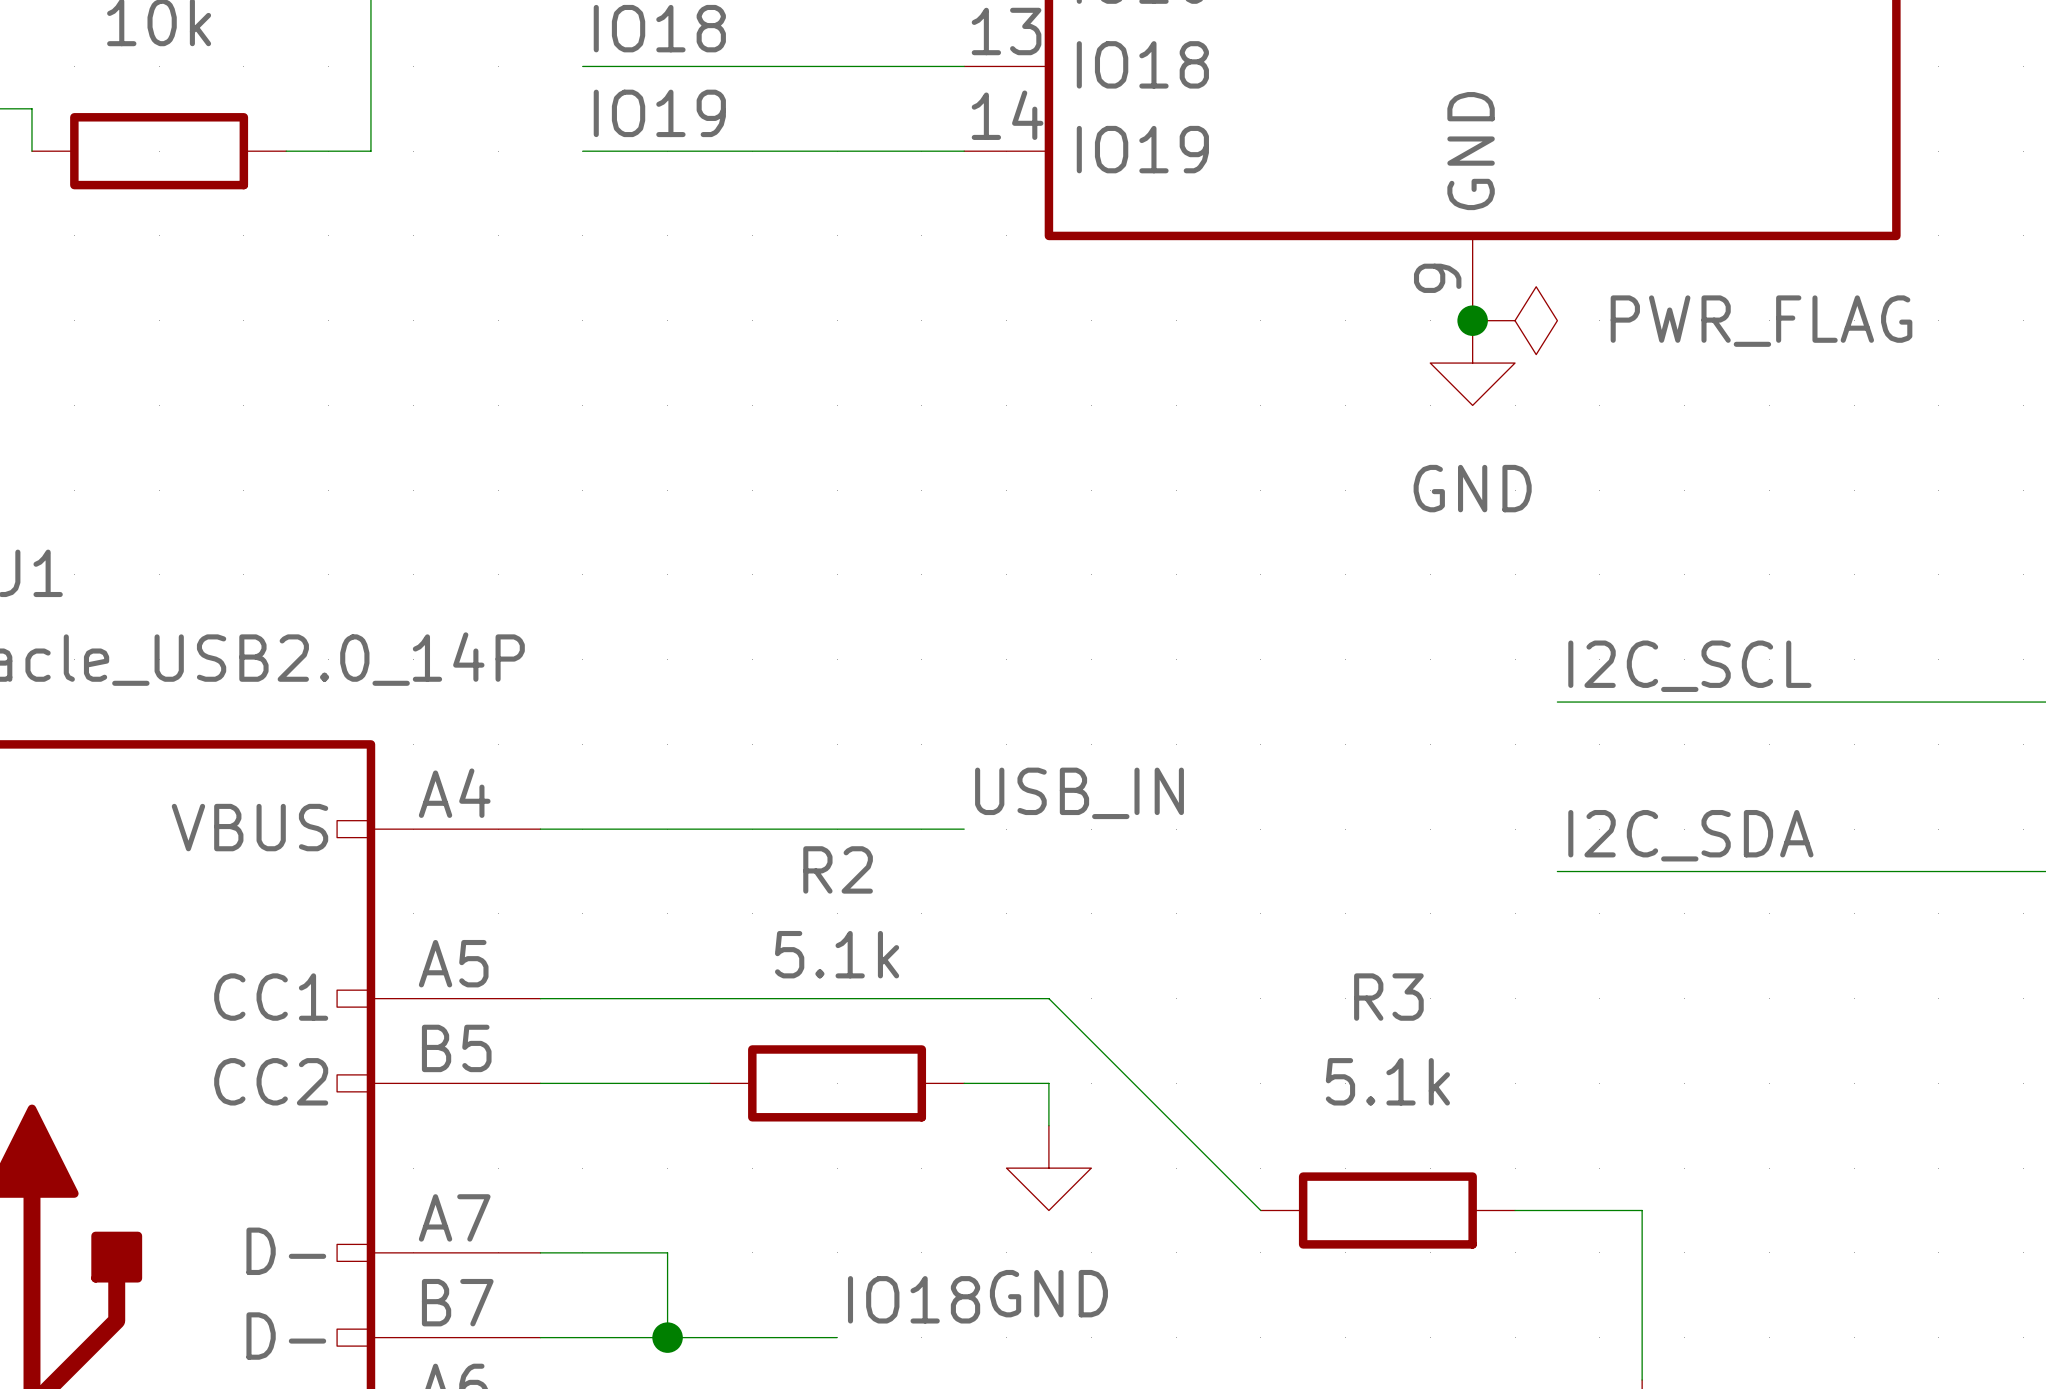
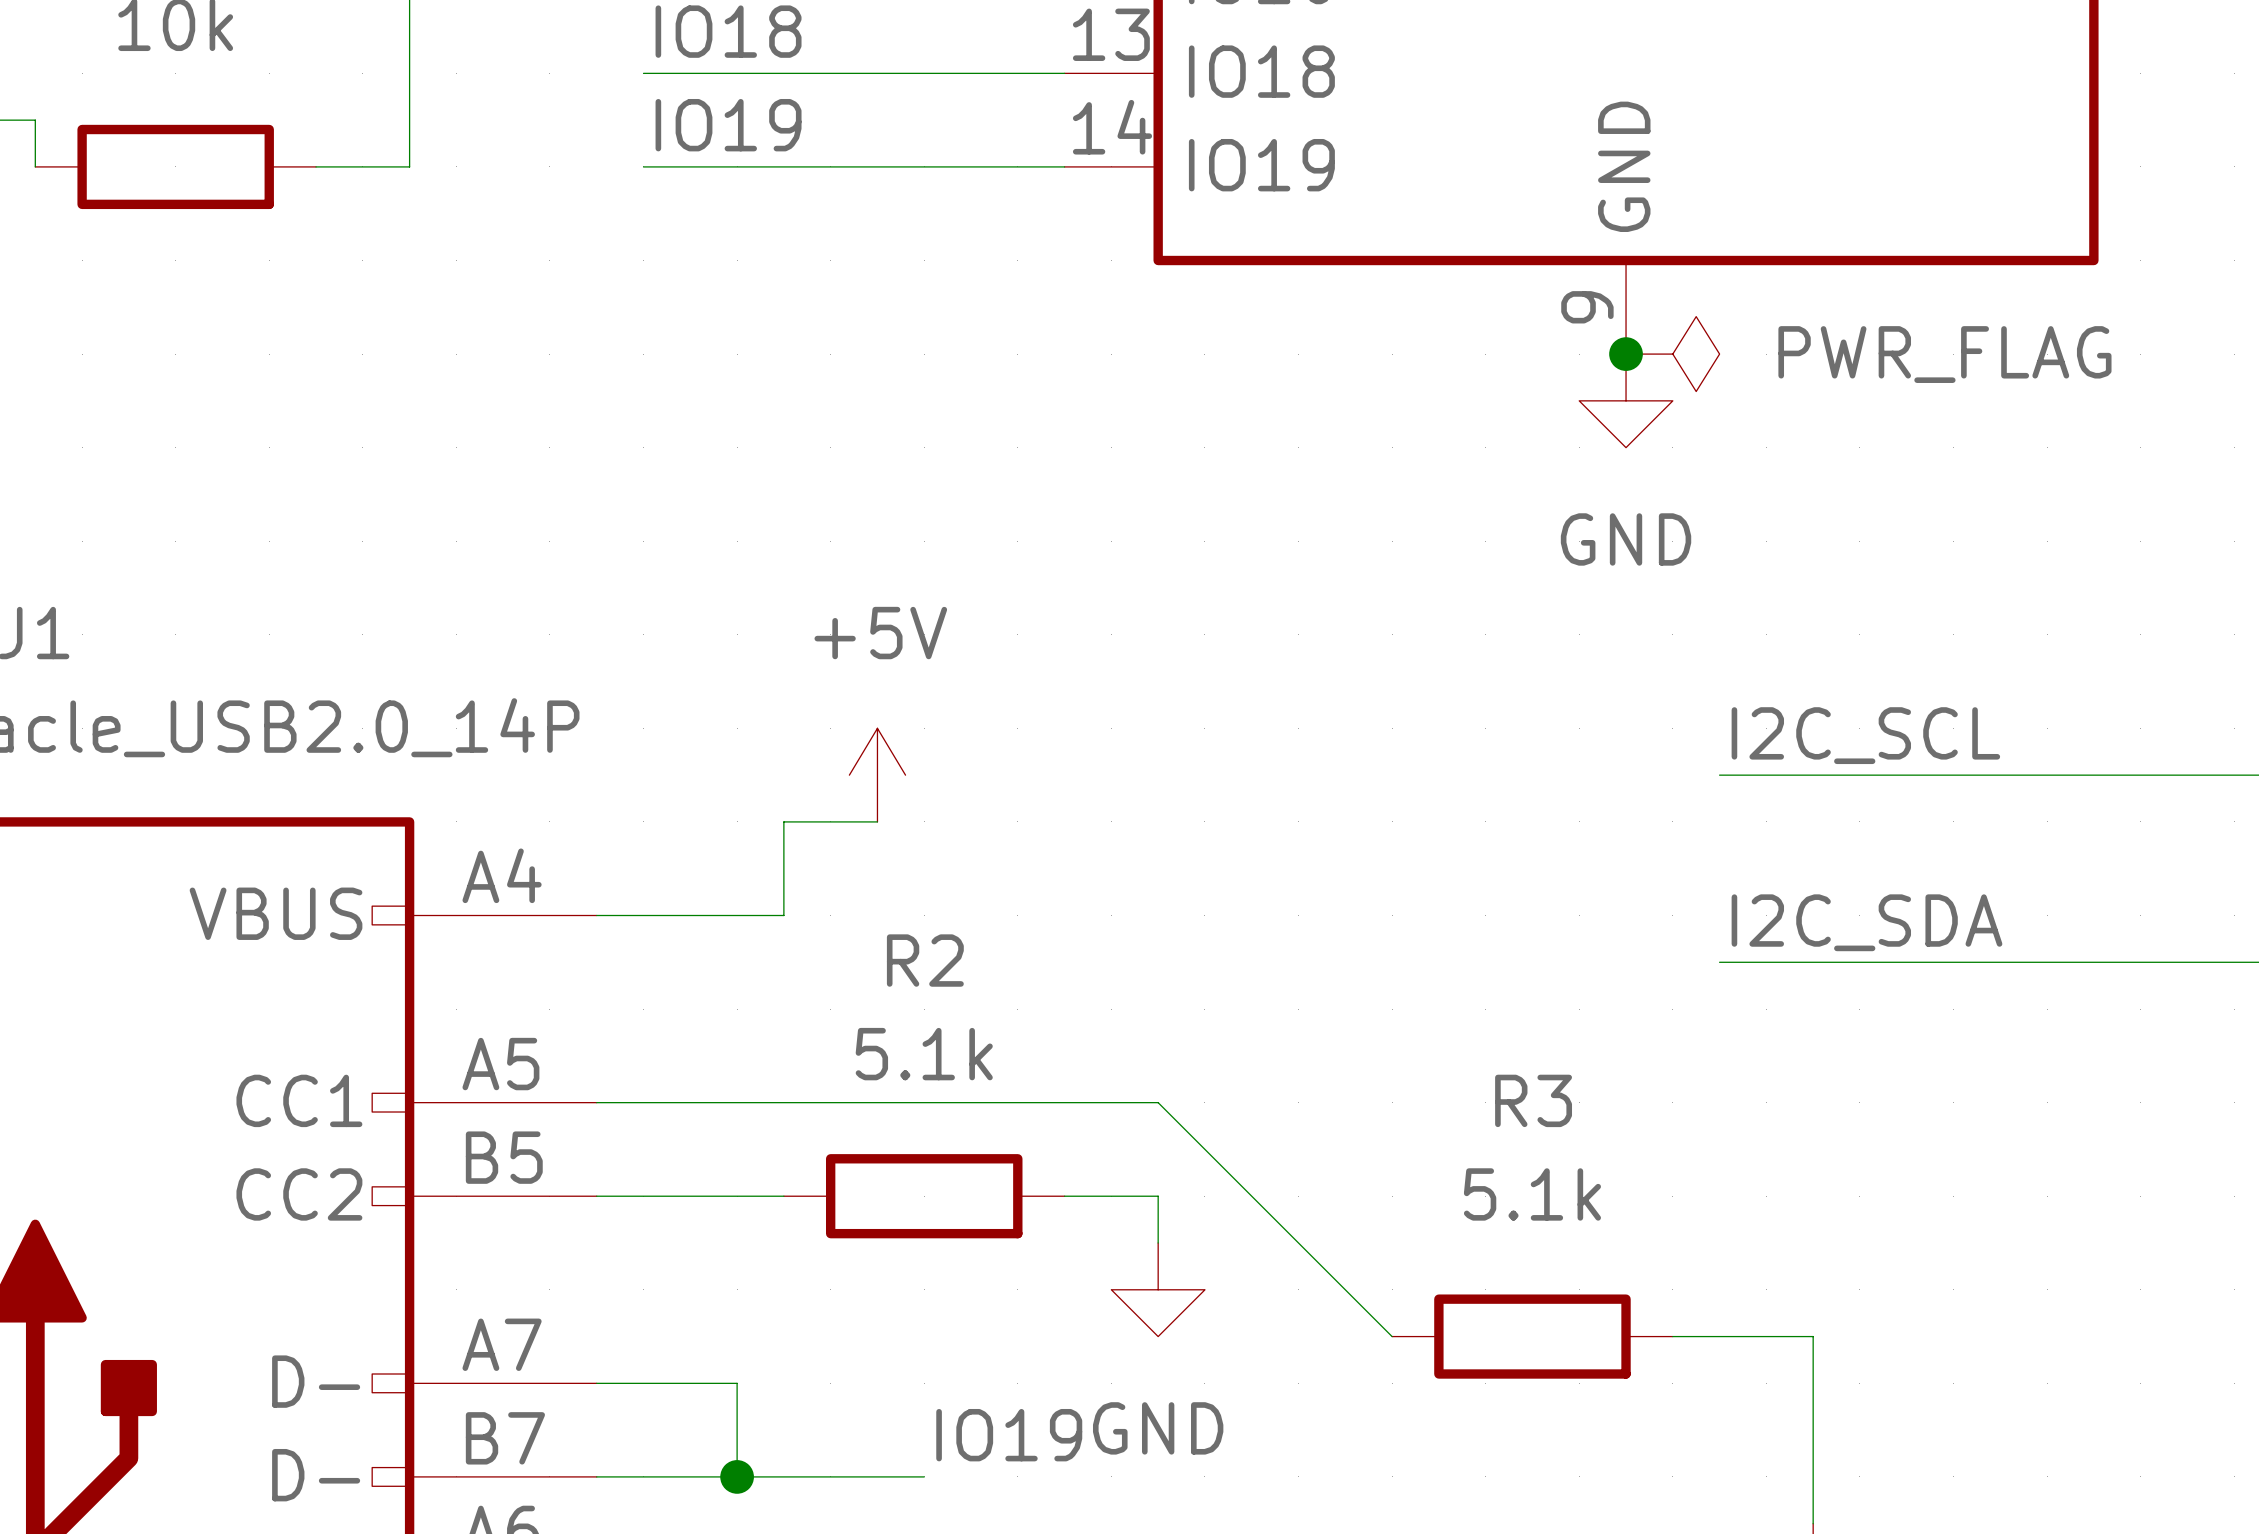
power symbol: none -> +5V (877, 775)
label: USB_IN (1079, 793) -> none
wire: (709, 829) (964, 829) -> (783, 915) (783, 821) (877, 821)
label: IO18 (914, 1299) -> IO19 (1009, 1435)

